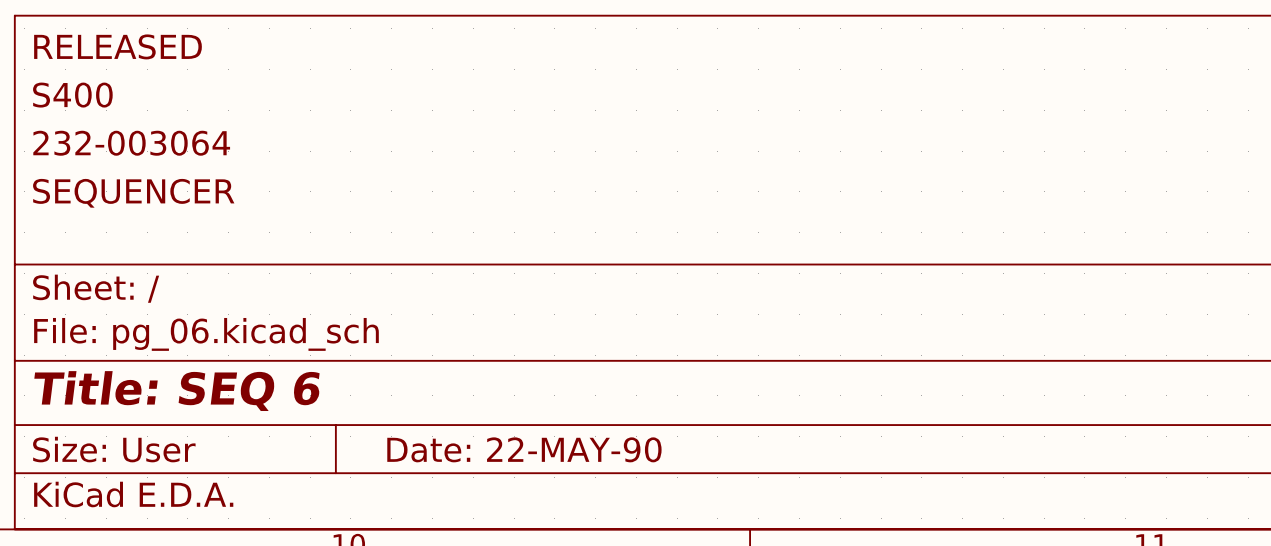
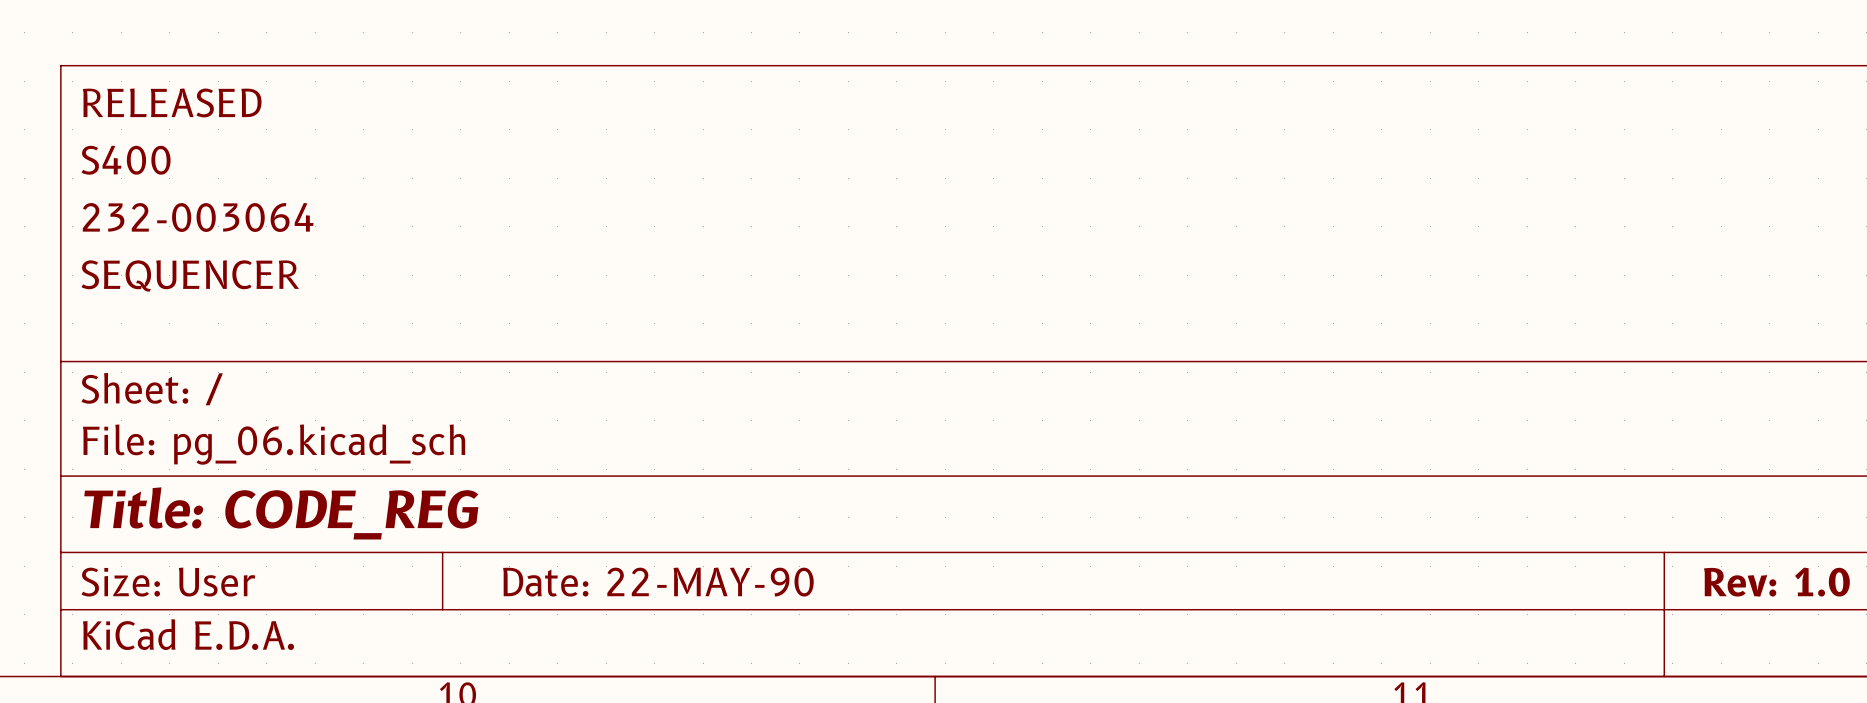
title block: Title: SEQ 6 (177, 391) -> Title: CODE_REG (281, 513)

